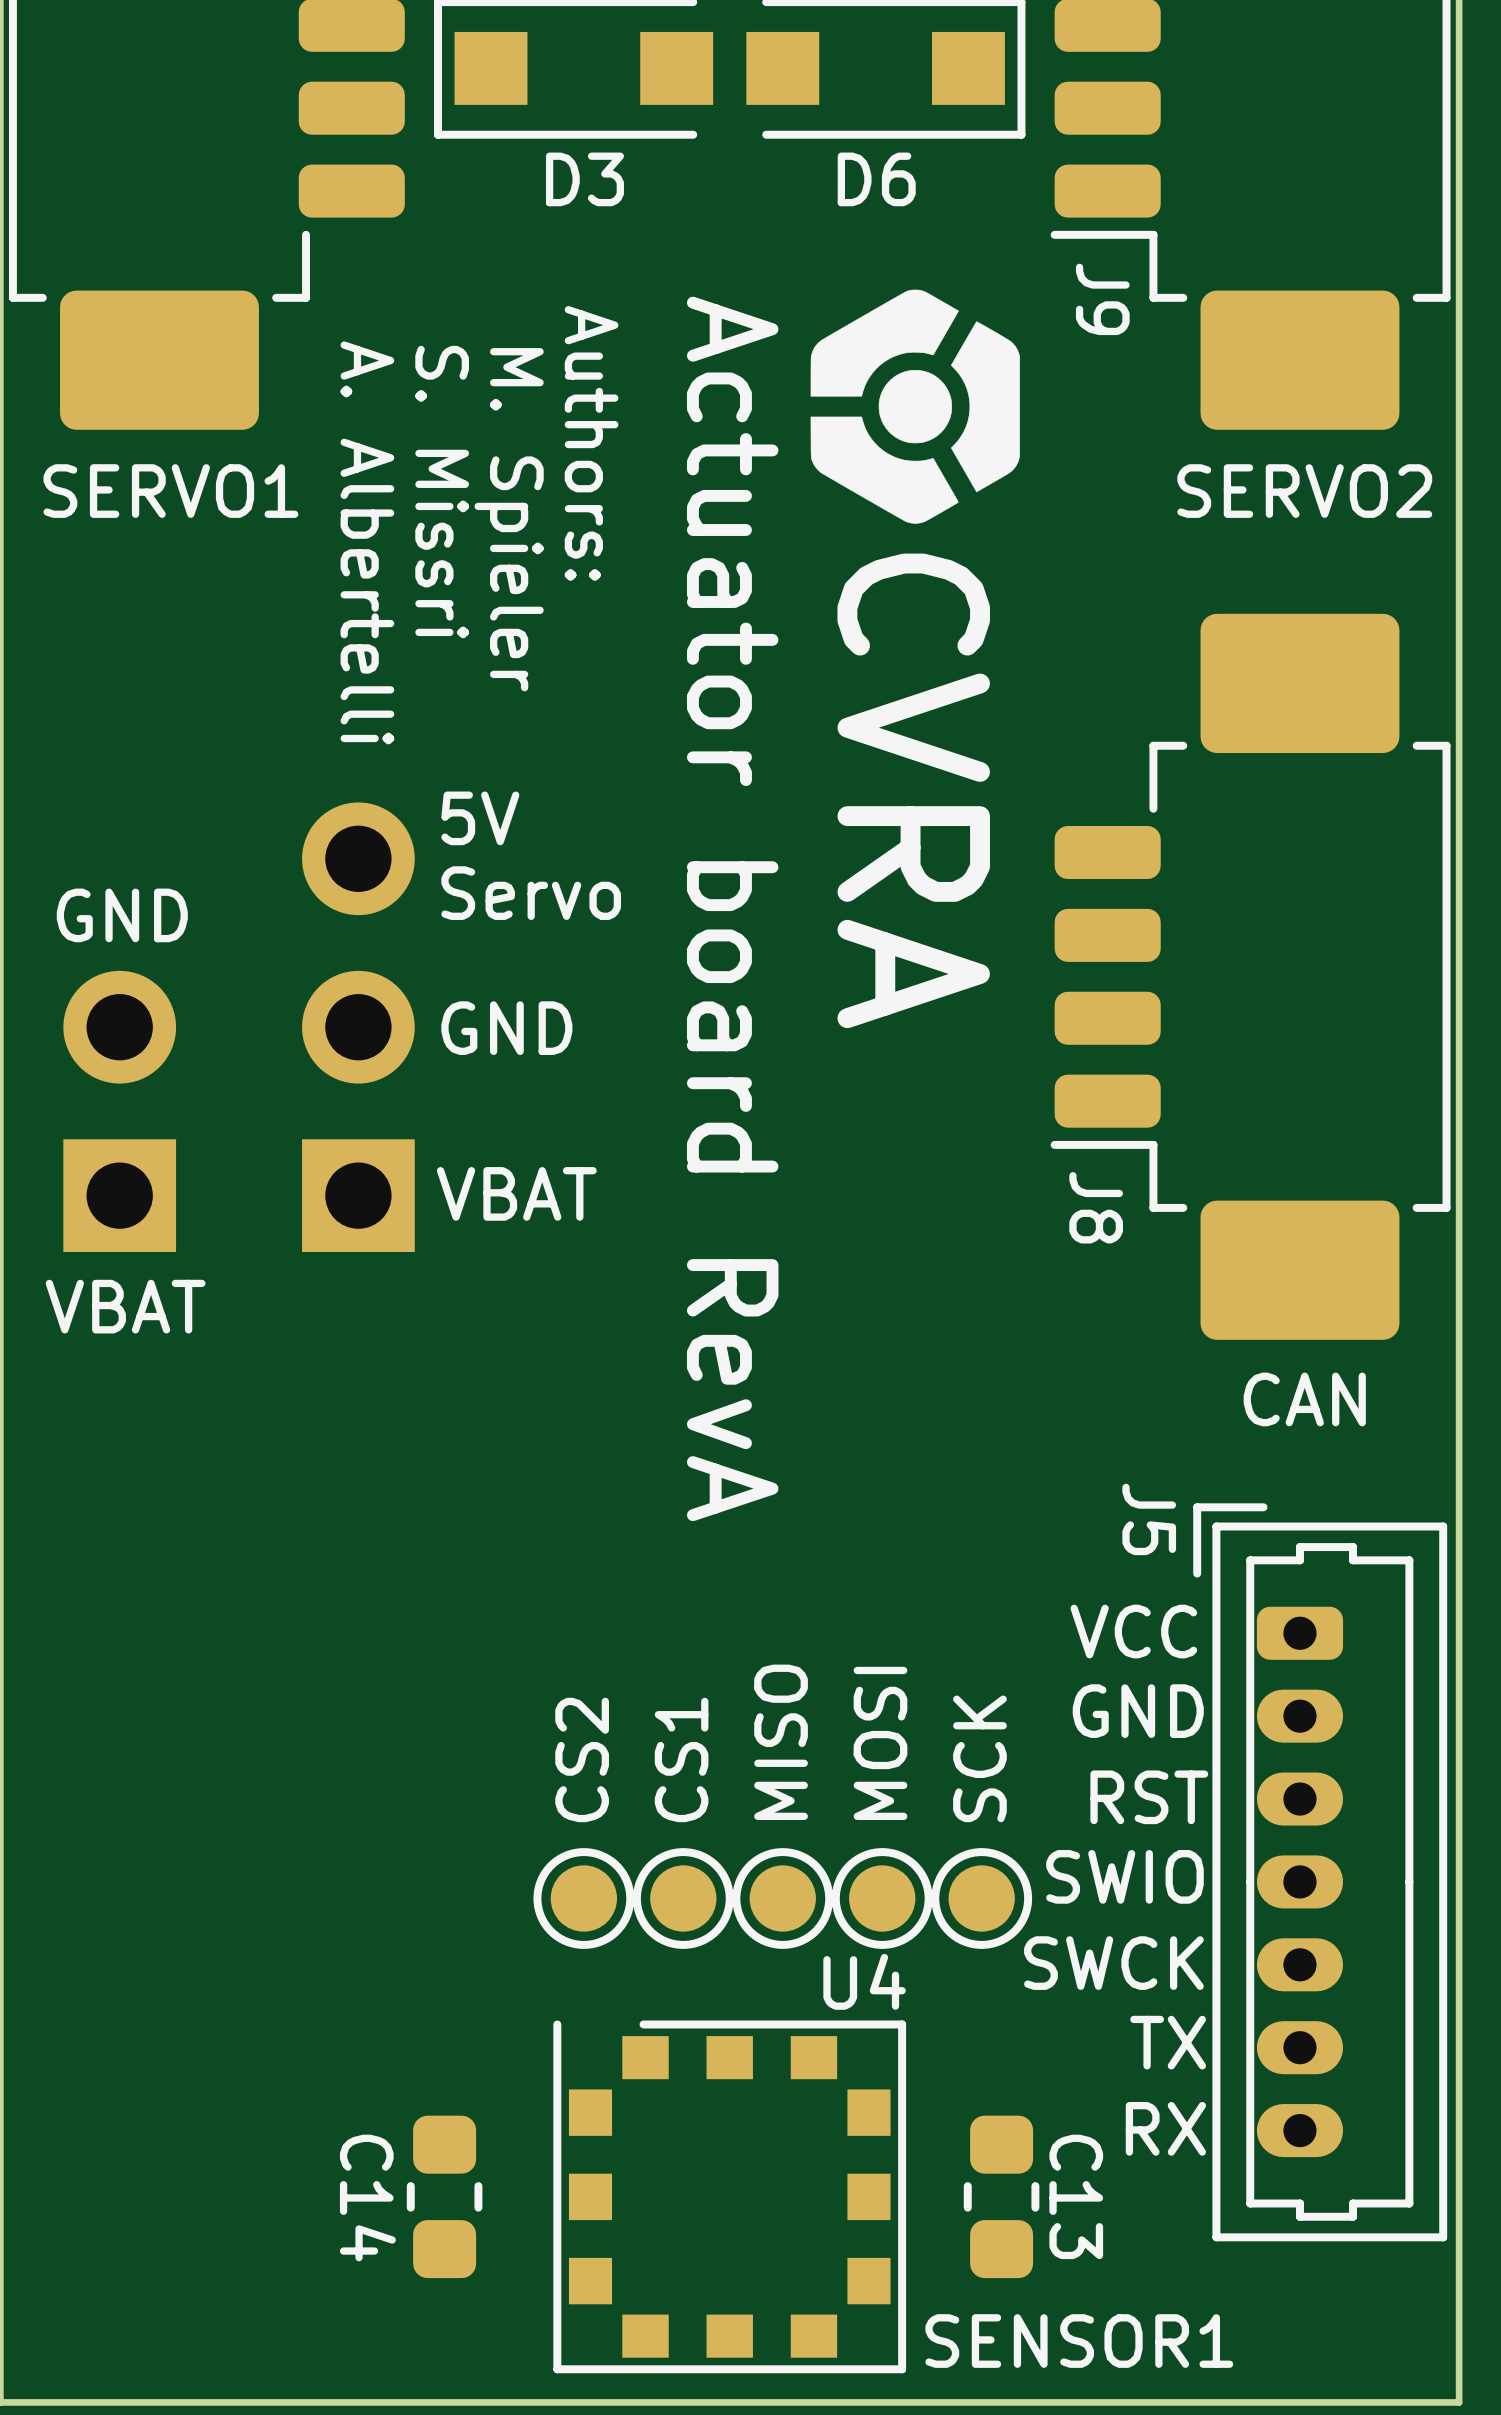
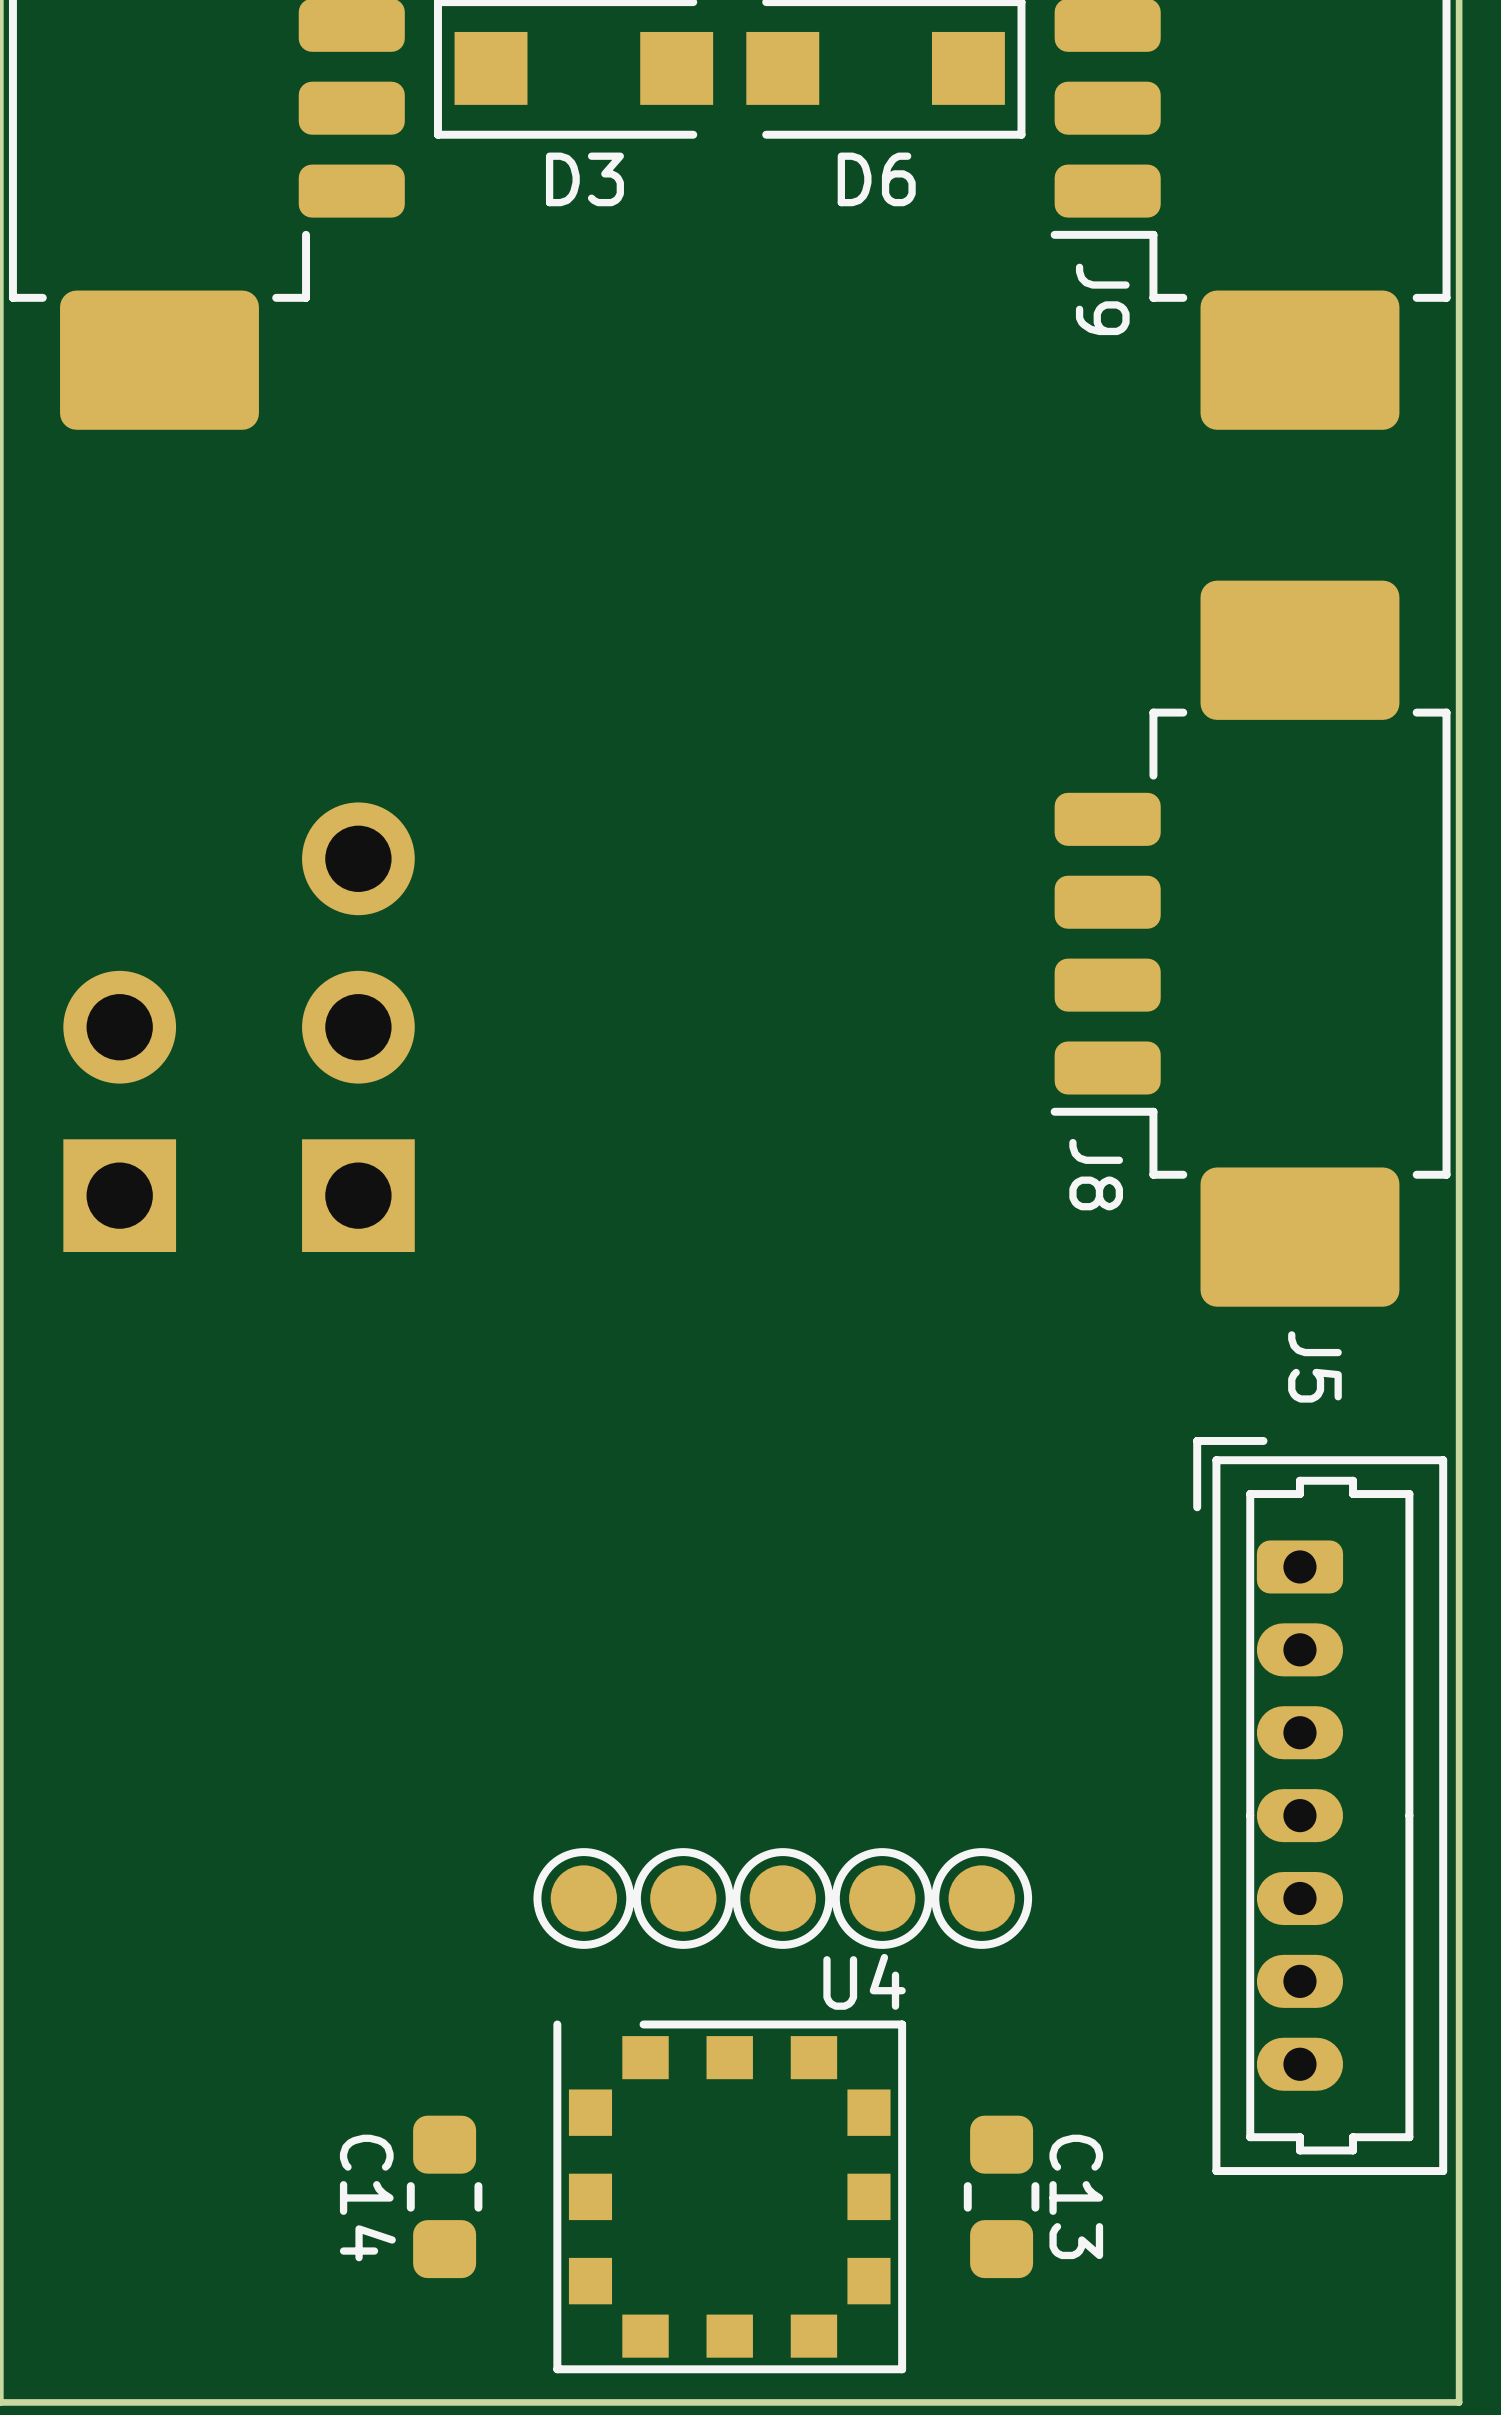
drawing: [810, 289, 1021, 524] -> none
text: Authors: (591, 443) -> none
text: SERVO1 (170, 491) -> none
text: SERVO2 (1304, 491) -> none
text: S. Missri (442, 492) -> none
text: M. Spieler (509, 519) -> none
text: A. Albertelli (367, 542) -> none
text: CVRA (913, 790) -> none
text: 5V (480, 818) -> none
text: Servo (531, 893) -> none
text: Actuator board RevA (732, 908) -> none
text: GND (122, 915) -> none
J8 position: (1250, 976) -> (1250, 943)
text: GND (506, 1028) -> none
text: VBAT (516, 1193) -> none
text: VBAT (125, 1306) -> none
text: CAN (1304, 1399) -> none
J5 name position: J5 (1149, 1519) -> J5 (1314, 1366)
text: VCC (1133, 1631) -> none
text: GND (1138, 1711) -> none
text: MISO (781, 1742) -> none
text: MOSI (880, 1743) -> none
text: SCK (979, 1758) -> none
text: CS2 (582, 1759) -> none
text: CS1 (681, 1759) -> none
text: RST (1149, 1797) -> none
J5 position: (1320, 1872) -> (1320, 1806)
text: SWIO (1124, 1876) -> none
text: SWCK (1113, 1963) -> none
text: TX (1168, 2042) -> none
text: RX (1165, 2128) -> none
text: SENSOR1 (1079, 2341) -> none

